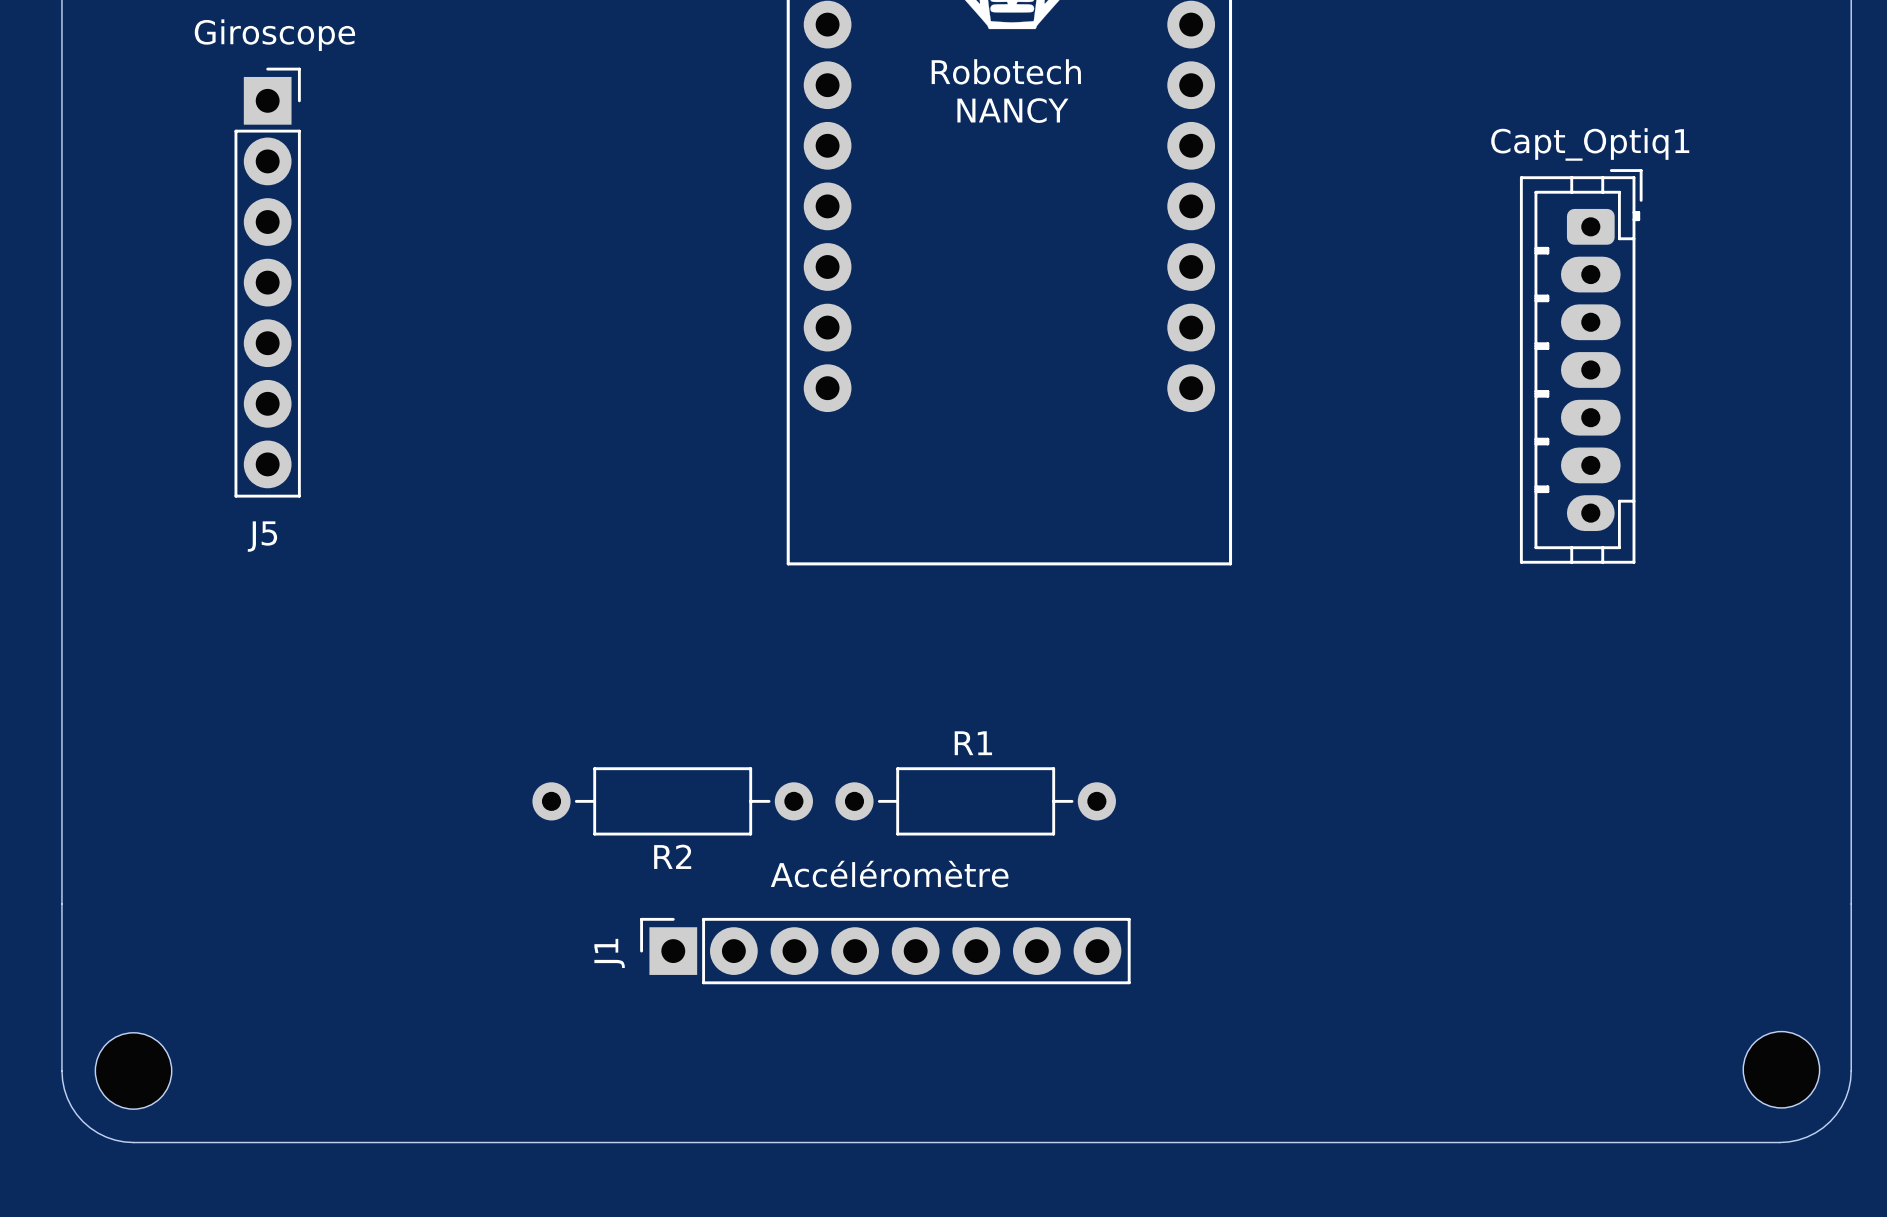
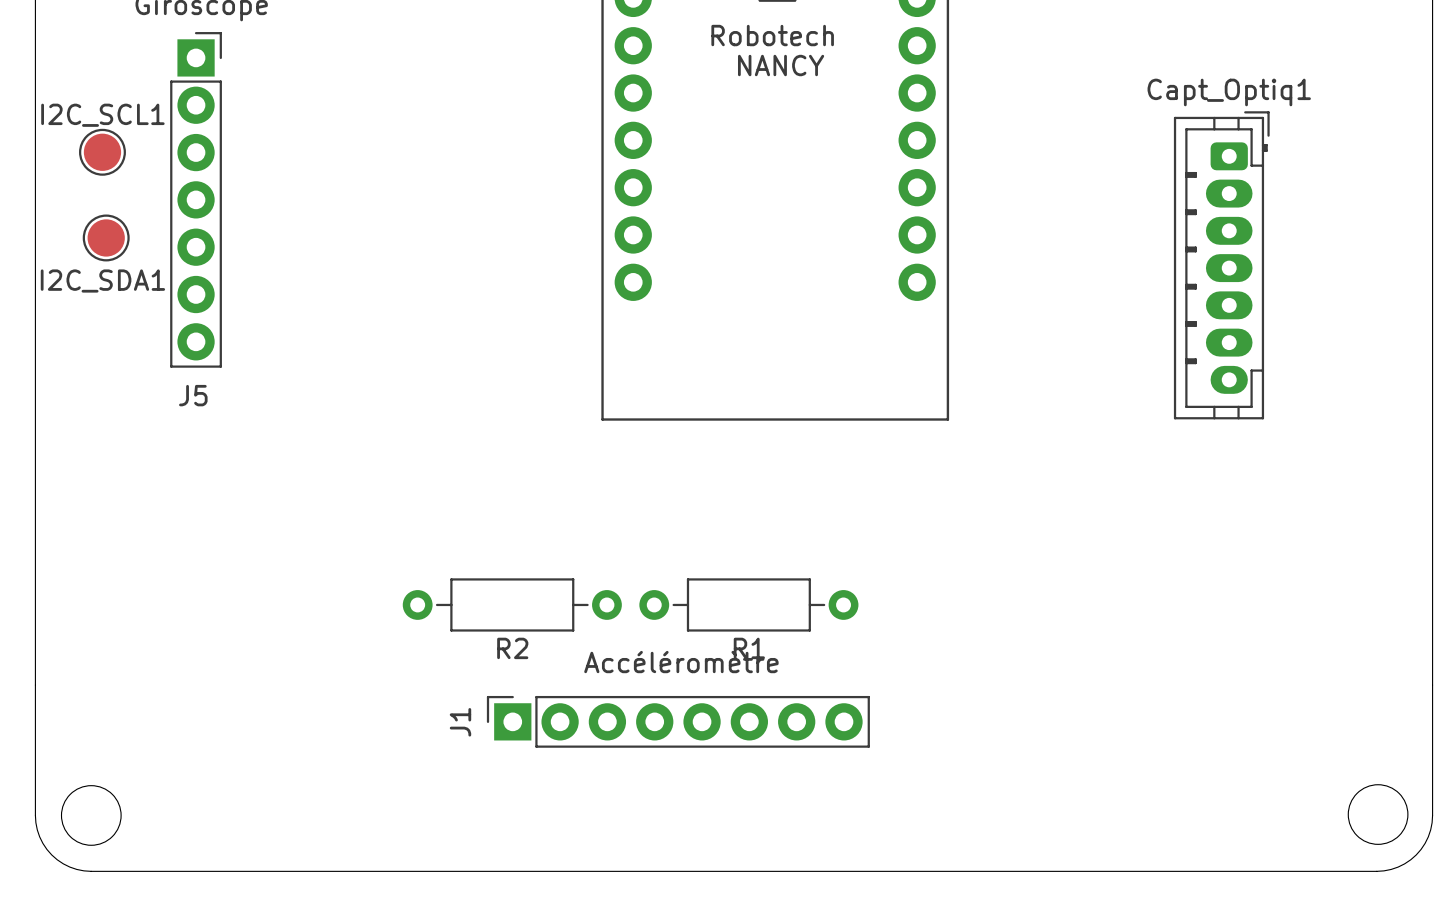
I2C_SCL1: none -> (102, 152)
I2C_SDA1: none -> (106, 237)
R1 name position: R1 (973, 743) -> R1 (749, 648)

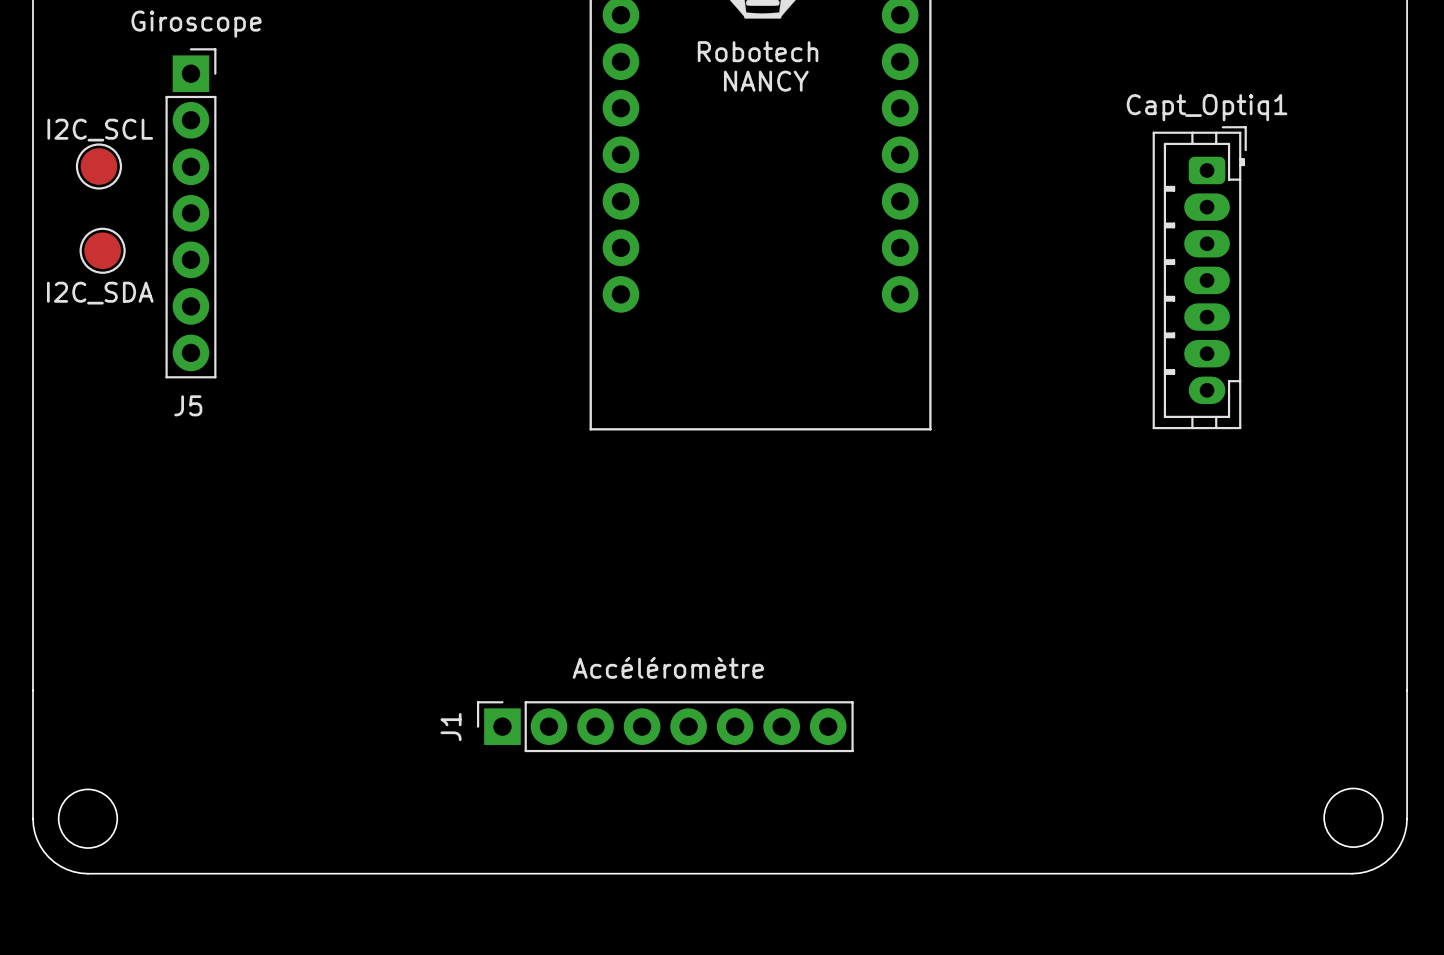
I2C_SCL1 name: I2C_SCL1 (102, 115) -> I2C_SCL (100, 130)
I2C_SDA1 name: I2C_SDA1 (102, 281) -> I2C_SDA (100, 293)
R2: (512, 604) -> none
R1: (748, 604) -> none

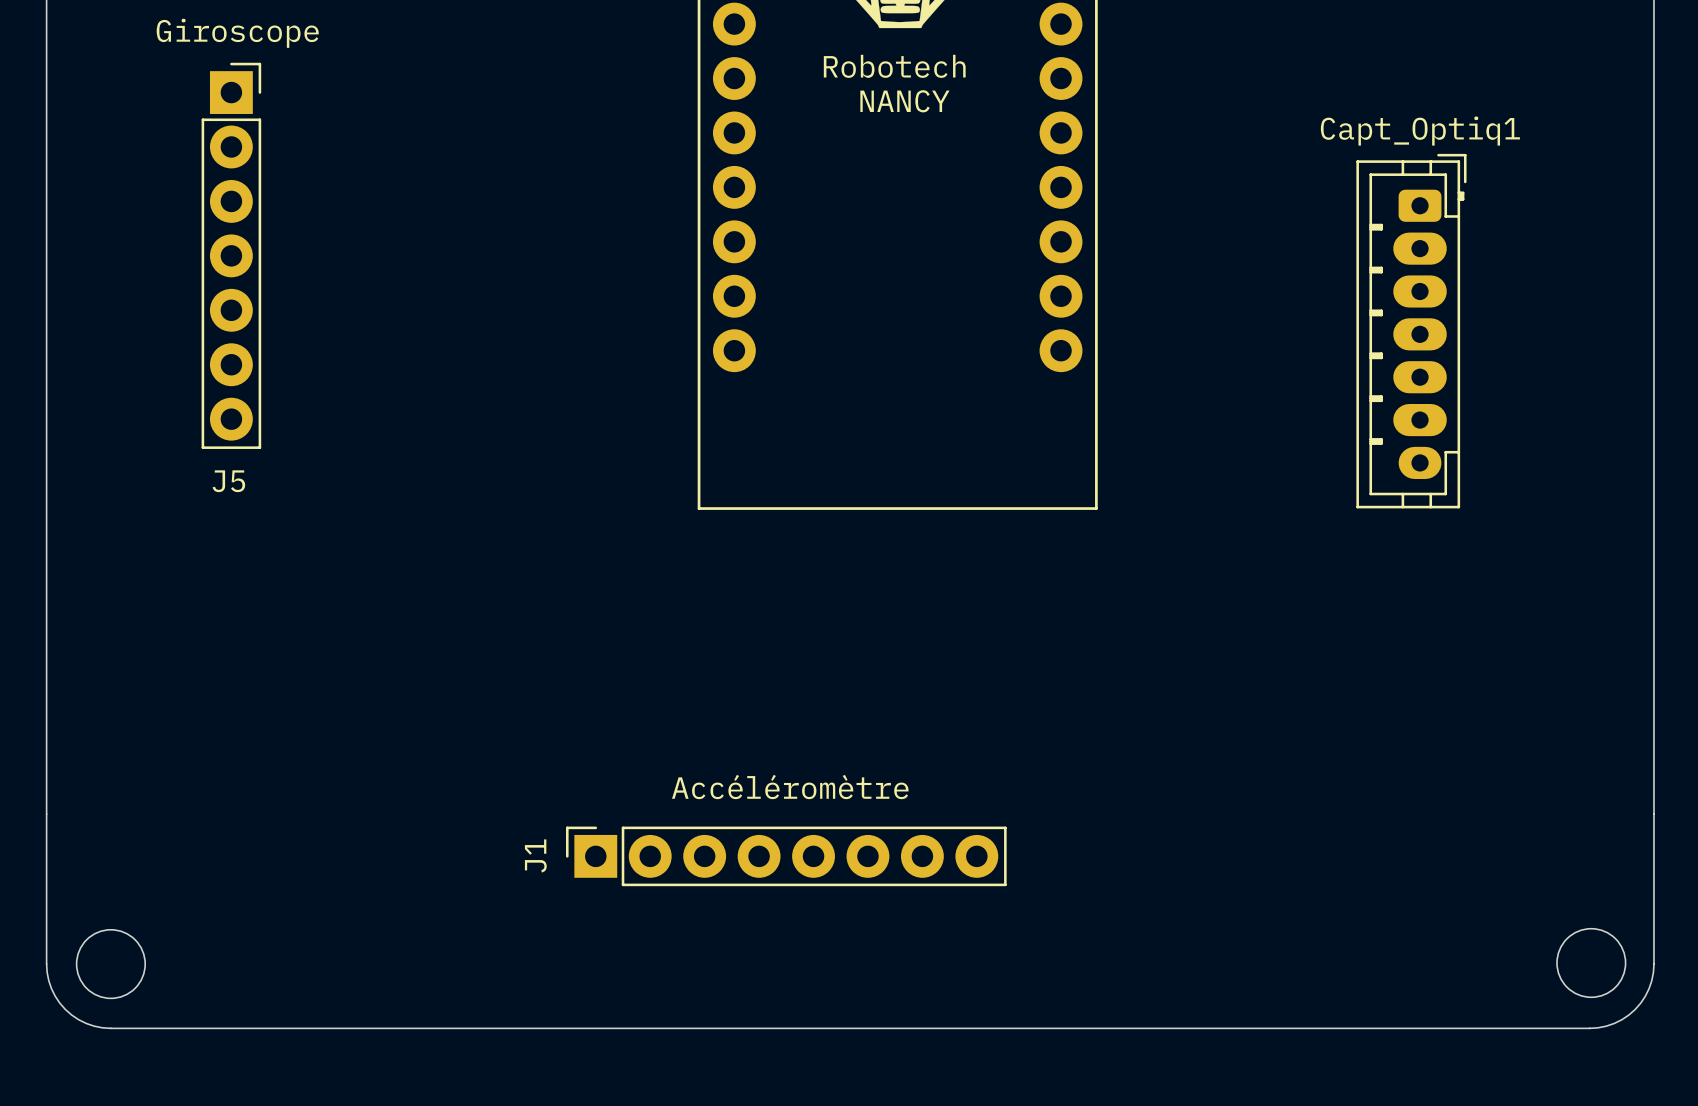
I2C_SCL: (98, 166) -> none
I2C_SDA: (102, 250) -> none

